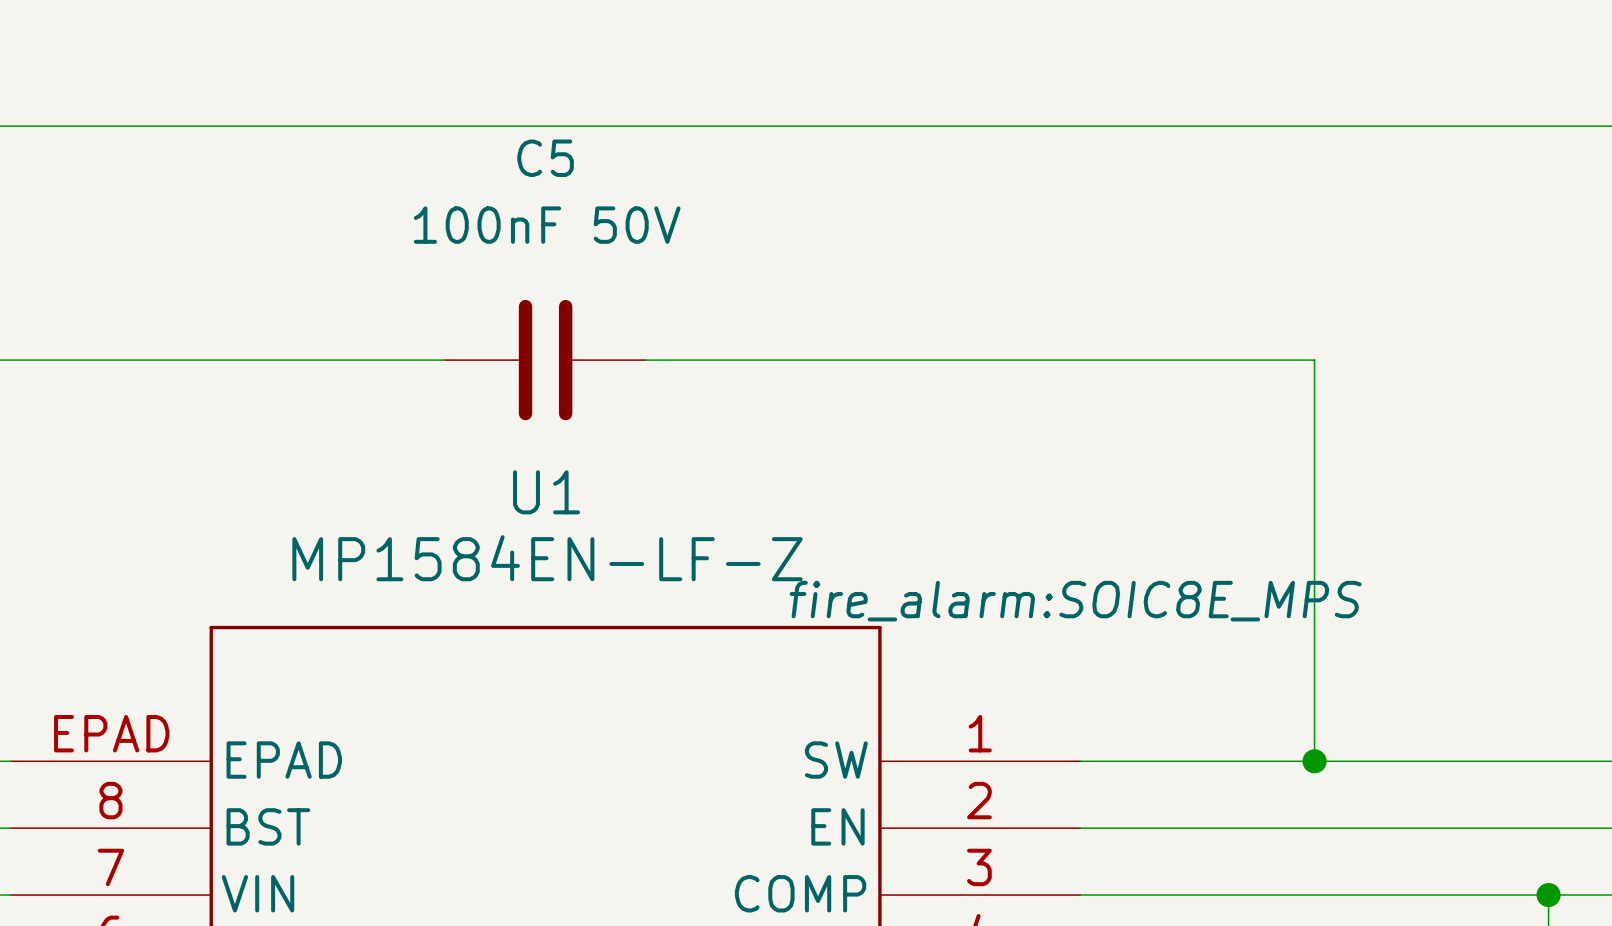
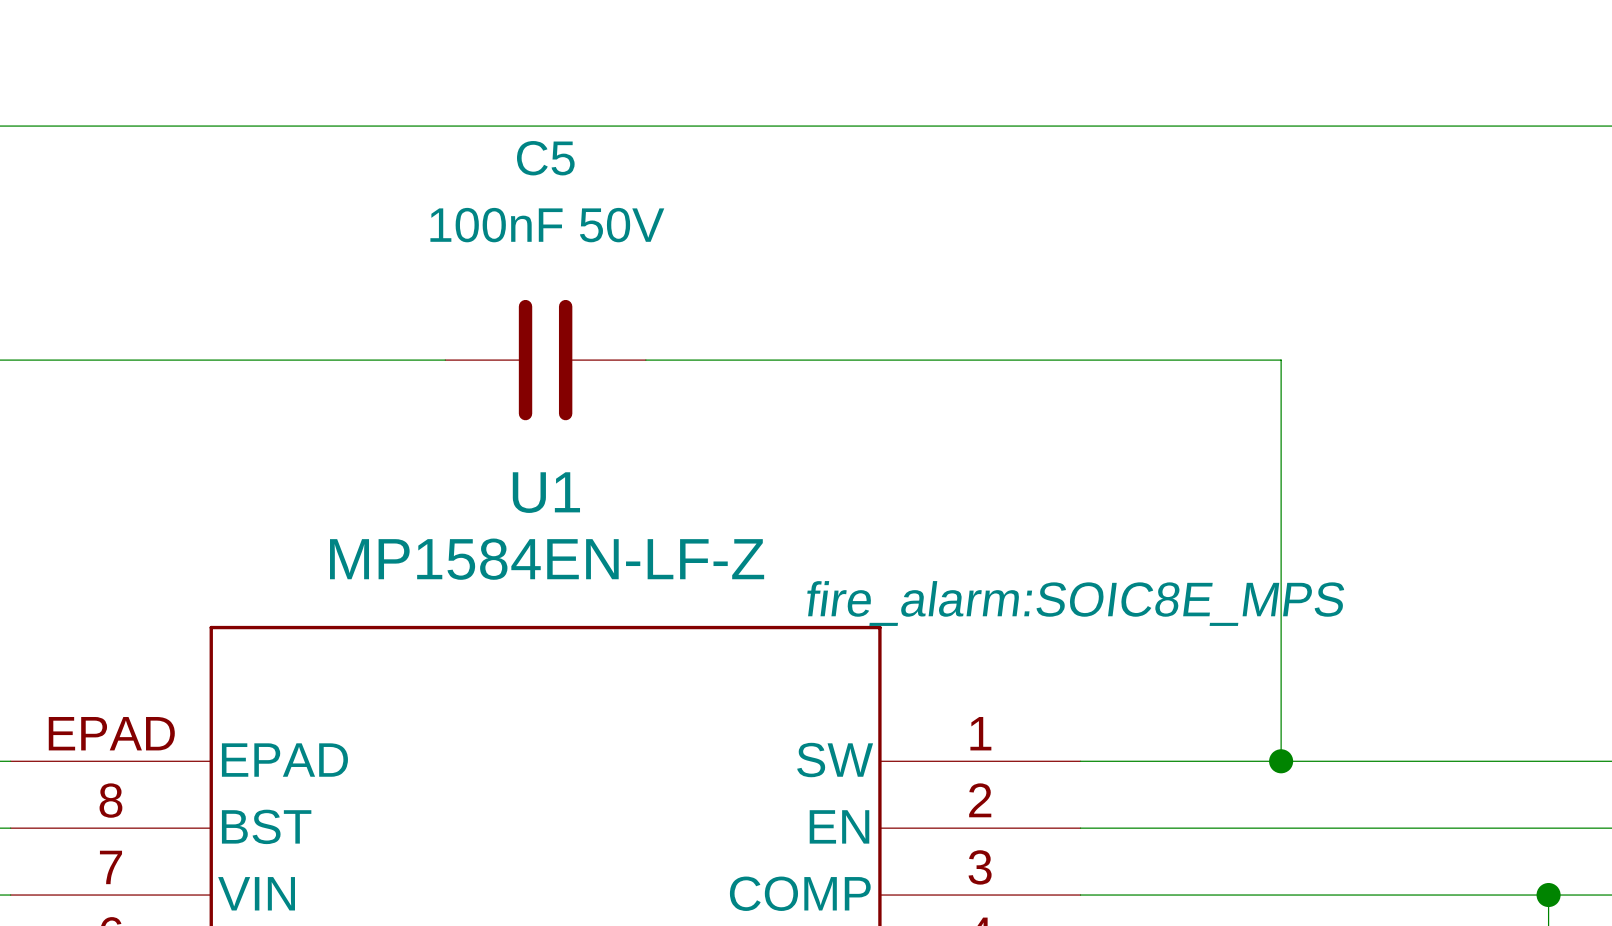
wire: (1281, 360) (1314, 360) (1314, 761) -> (1281, 360) (1281, 761)
junction position: (1314, 761) -> (1281, 761)

